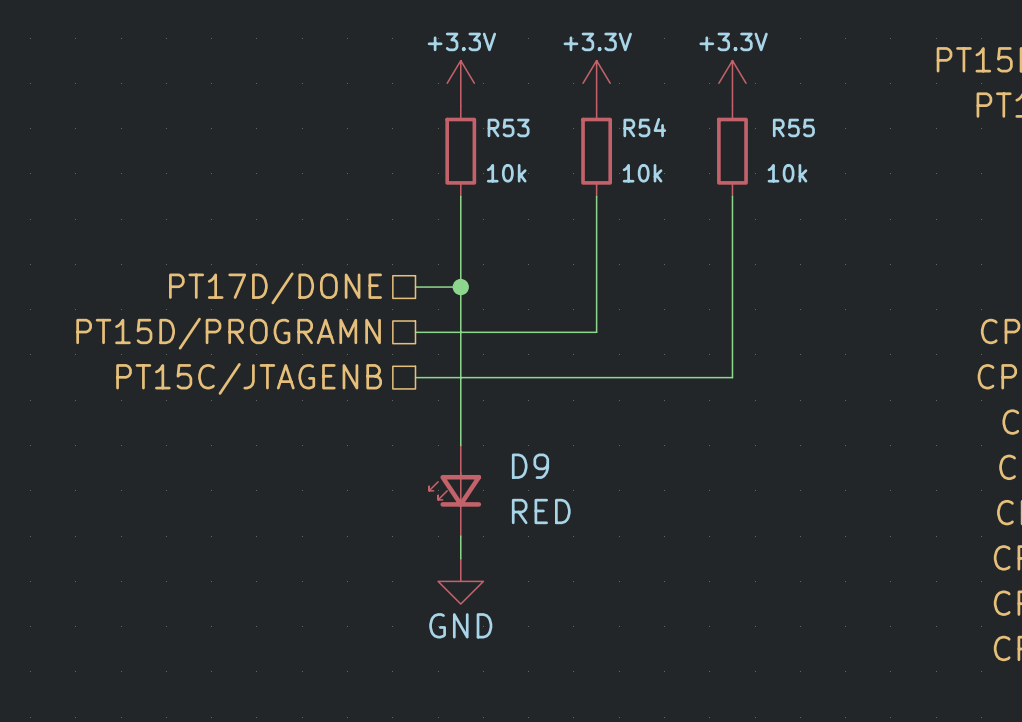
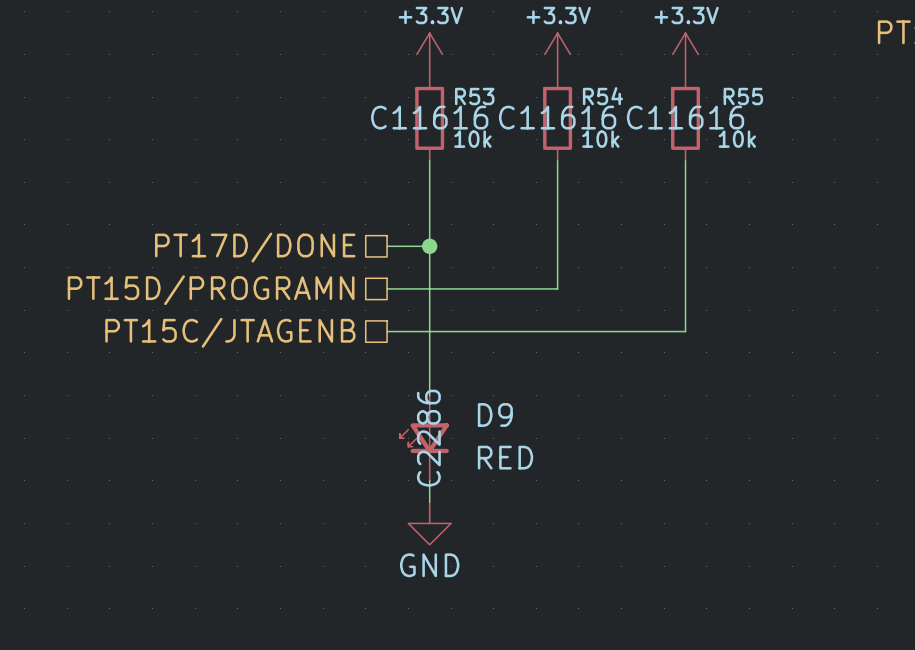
R53 text: none -> C11616 (429, 117)
R54 text: none -> C11616 (557, 117)
R55 text: none -> C11616 (685, 117)
D9 text: none -> C2286 (428, 438)

